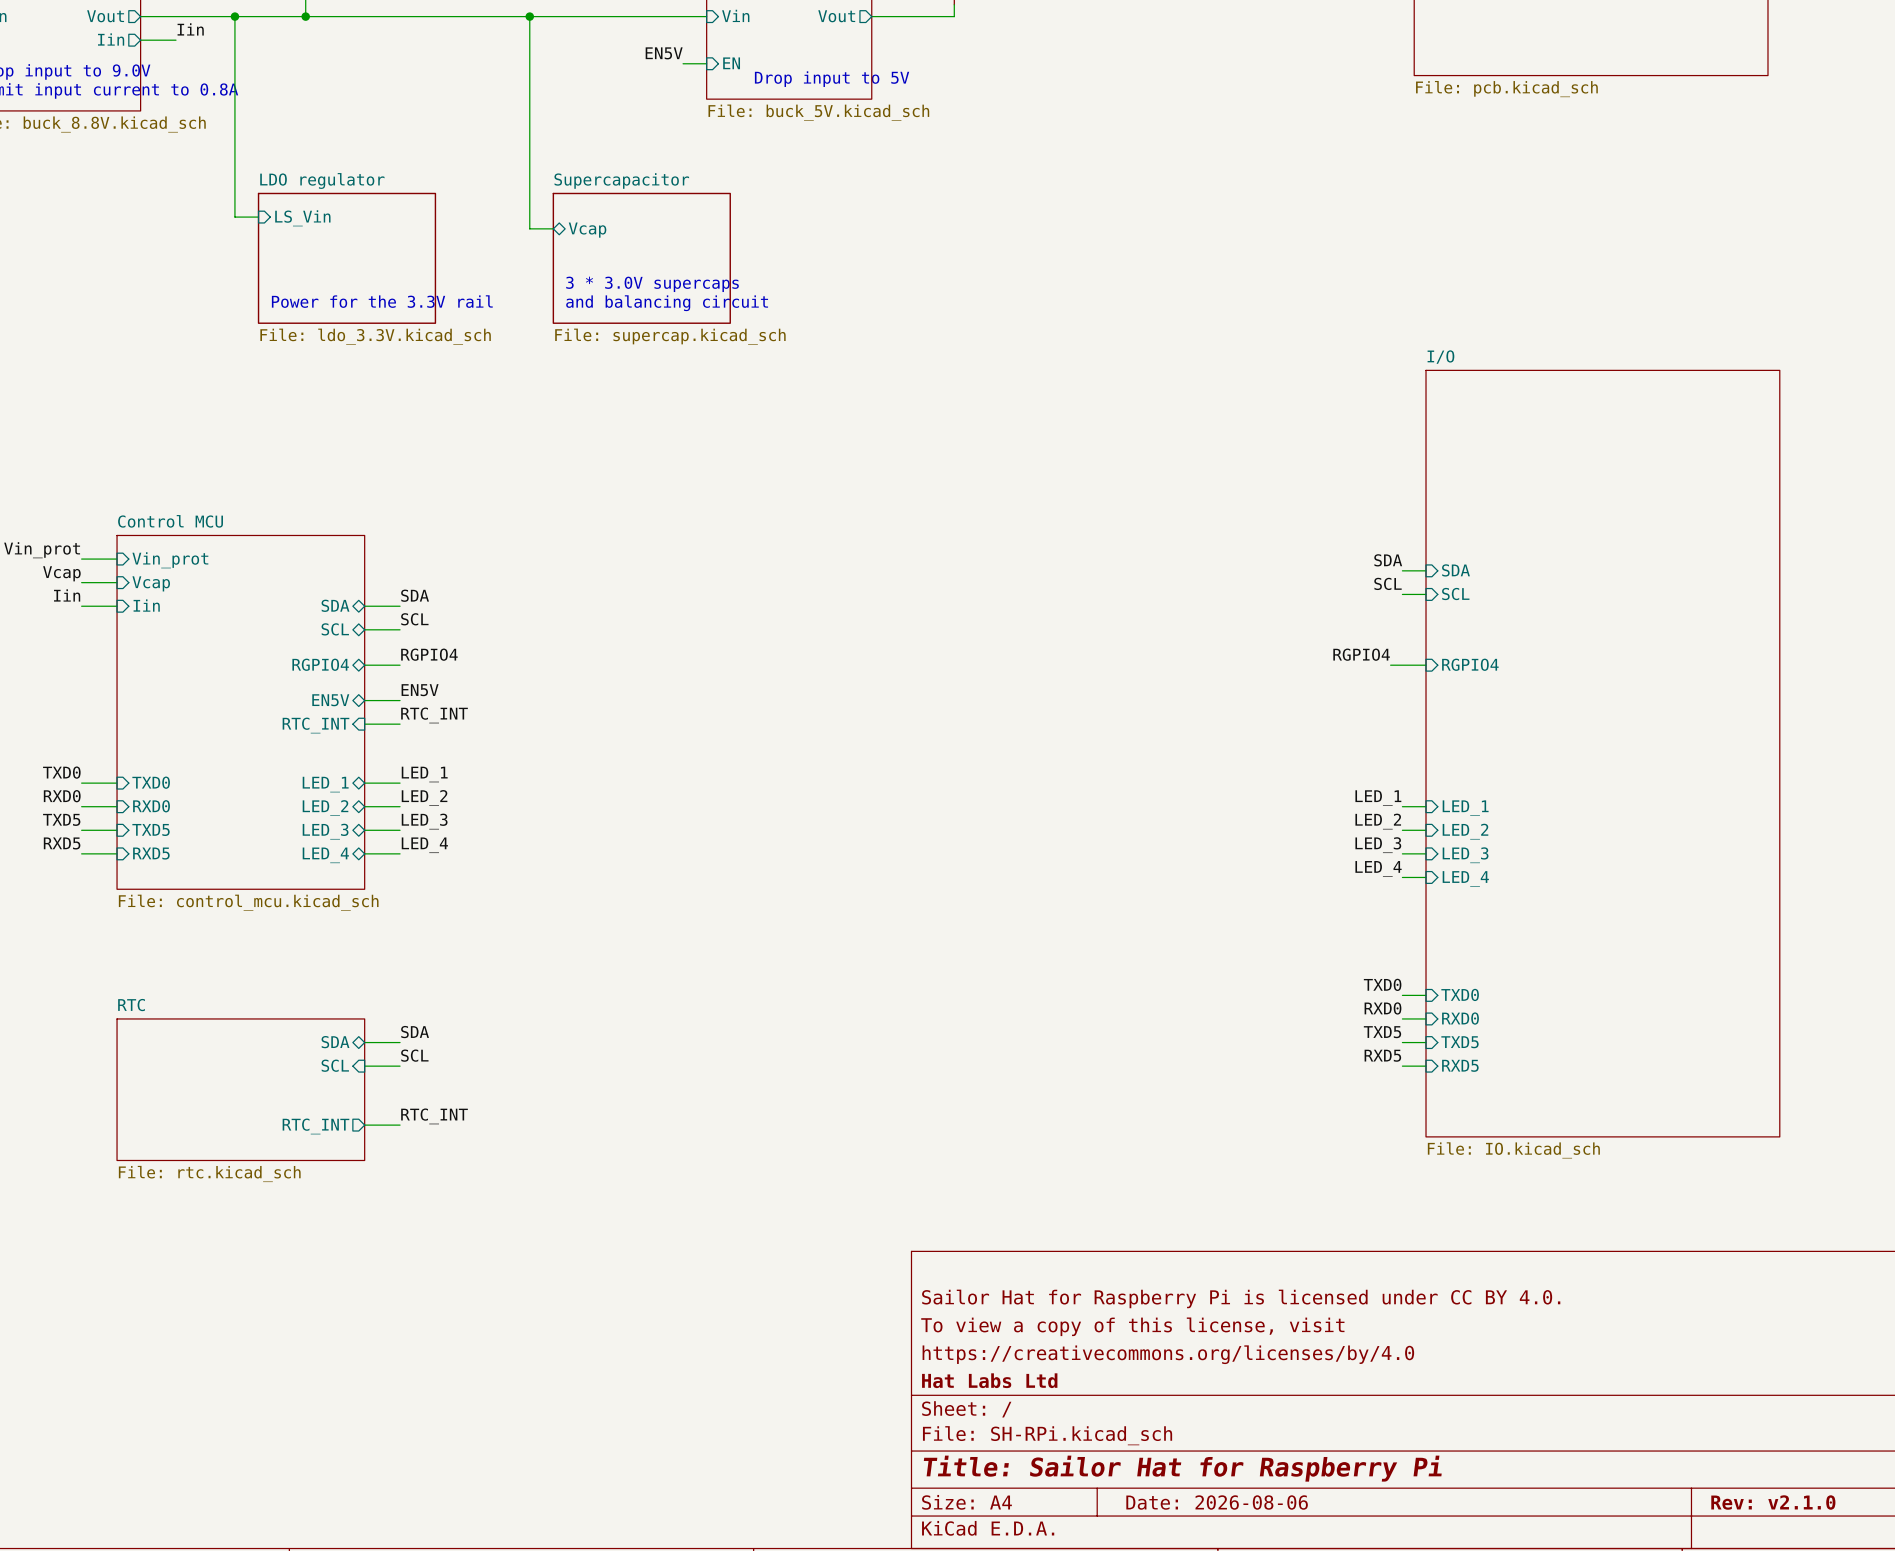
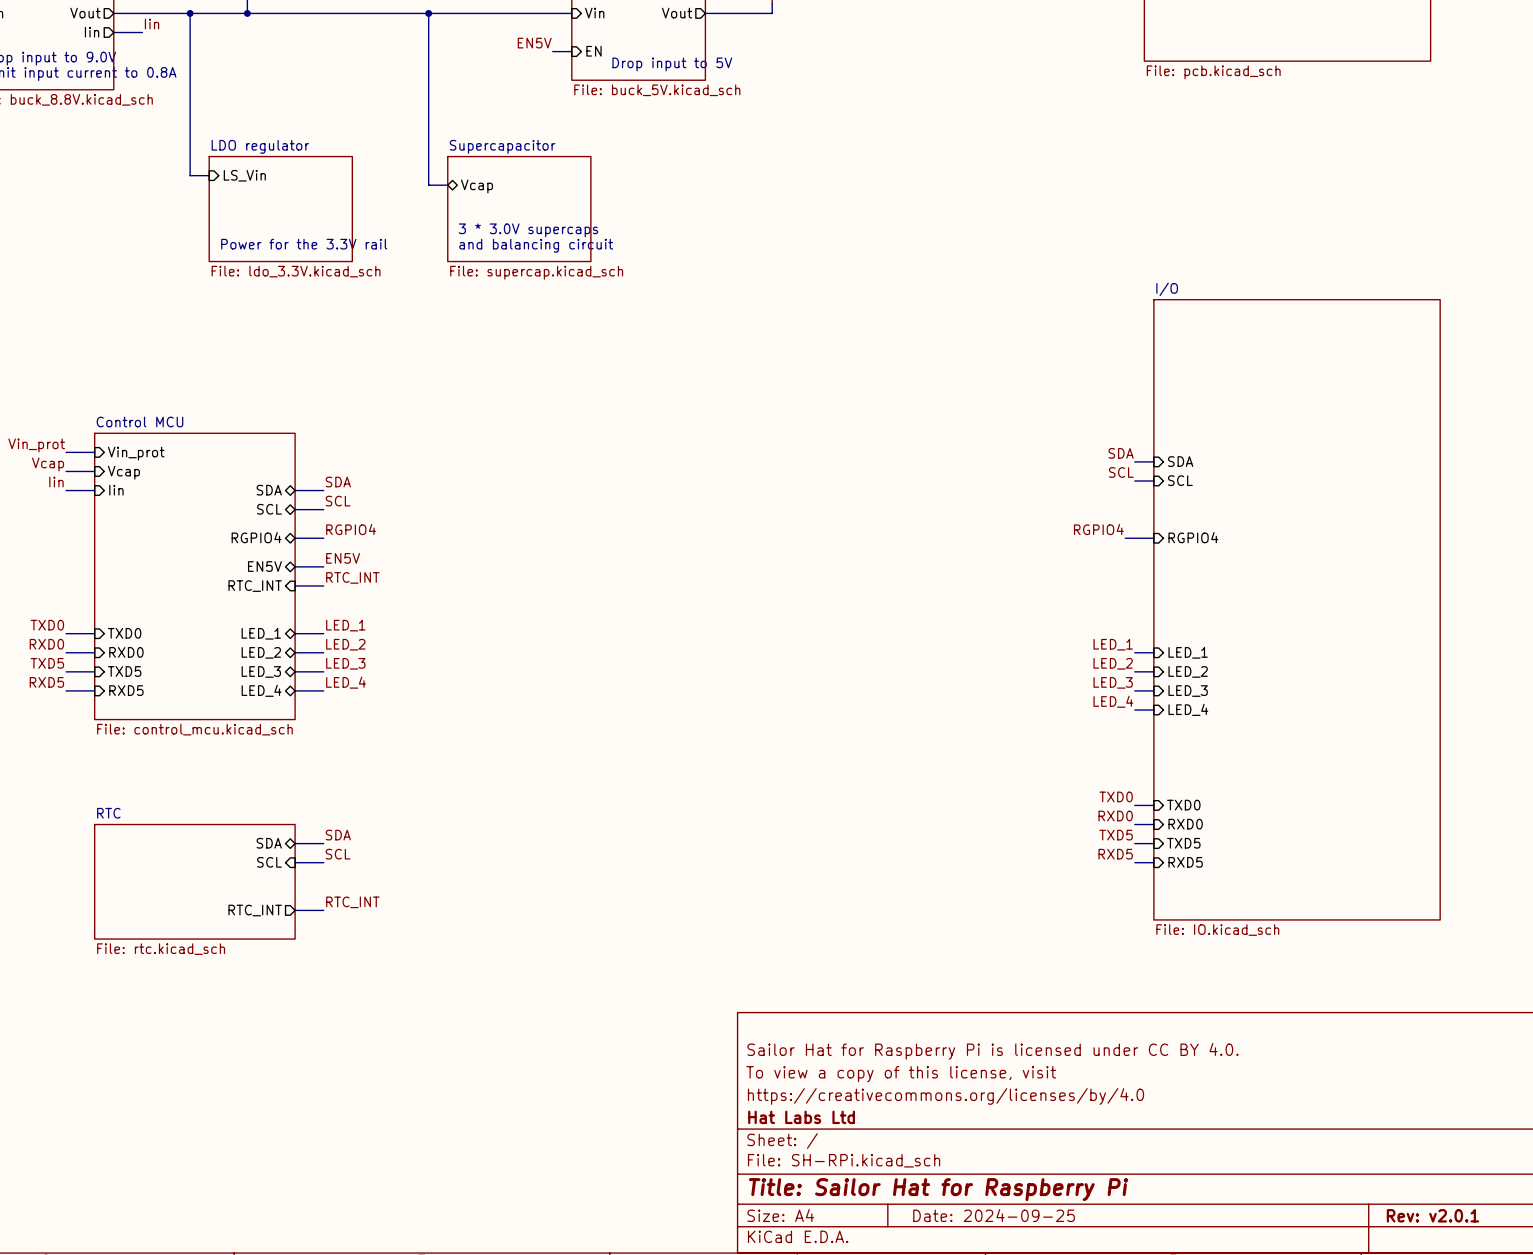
title block: Date: 2026-08-06 (1217, 1502) -> Date: 2024-09-25 (994, 1215)
title block: Rev: v2.1.0 (1773, 1502) -> Rev: v2.0.1 (1432, 1215)

